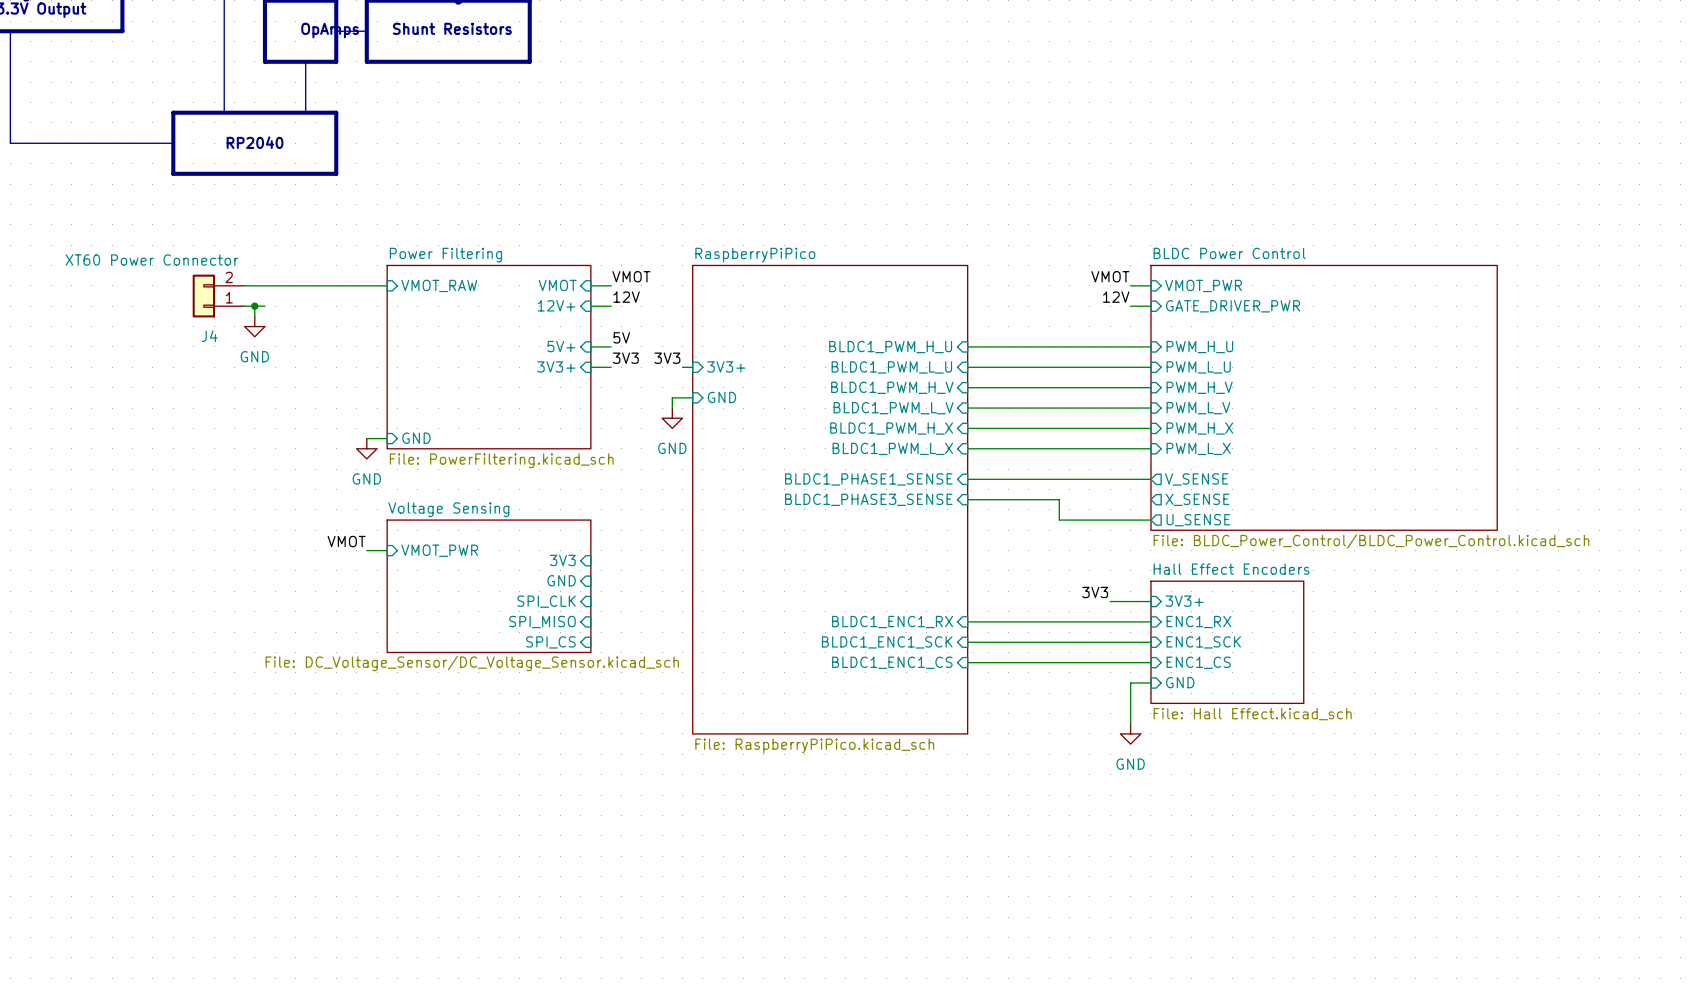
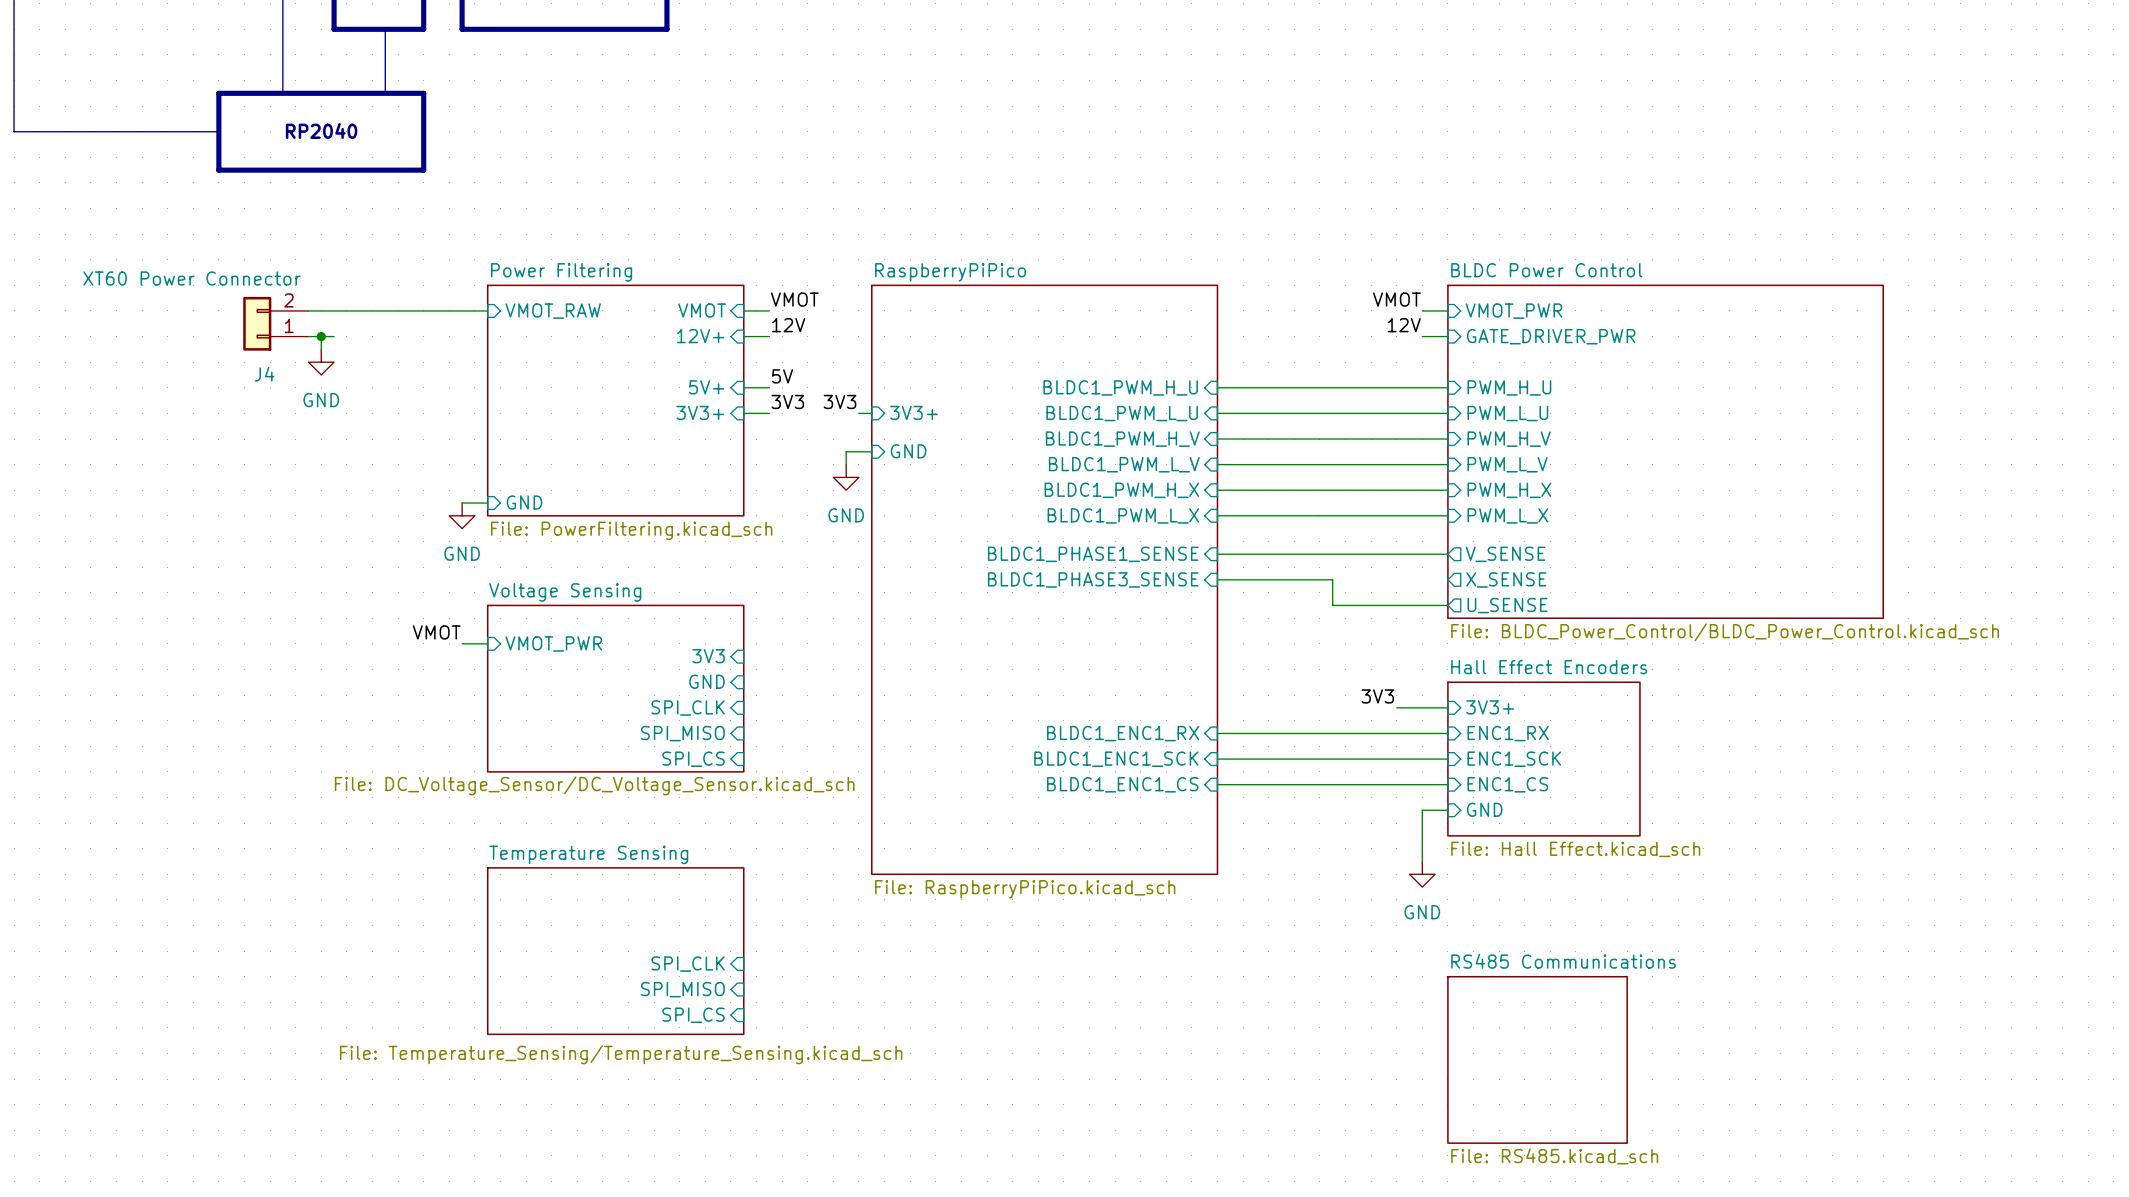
sheet Temperature Sensing: none -> File: Temperature_Sensing/Temperature_Sensing.kicad_sch (615, 951)
sheet pin: none -> SPI_CLK (688, 964)
sheet pin: none -> SPI_MISO (682, 989)
sheet pin: none -> SPI_CS (693, 1015)
sheet RS485 Communications: none -> File: RS485.kicad_sch (1537, 1059)

